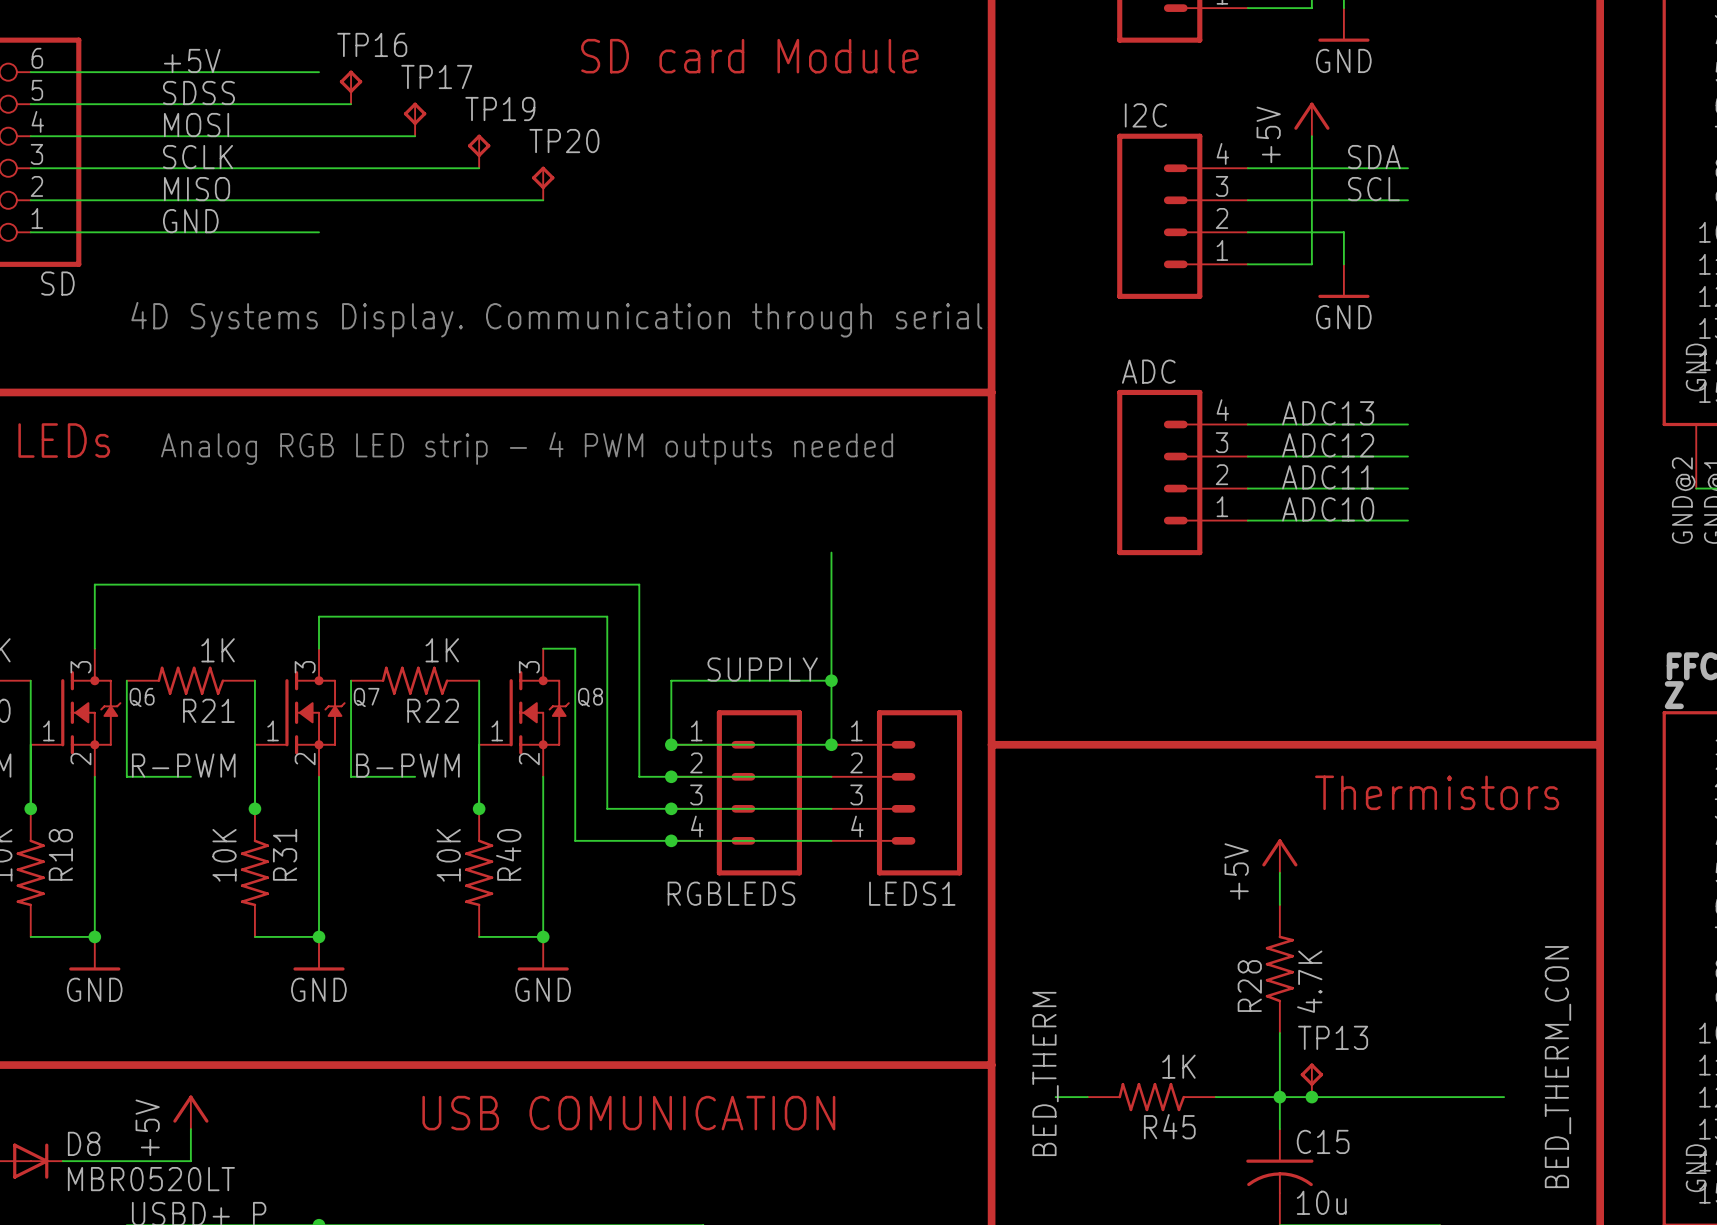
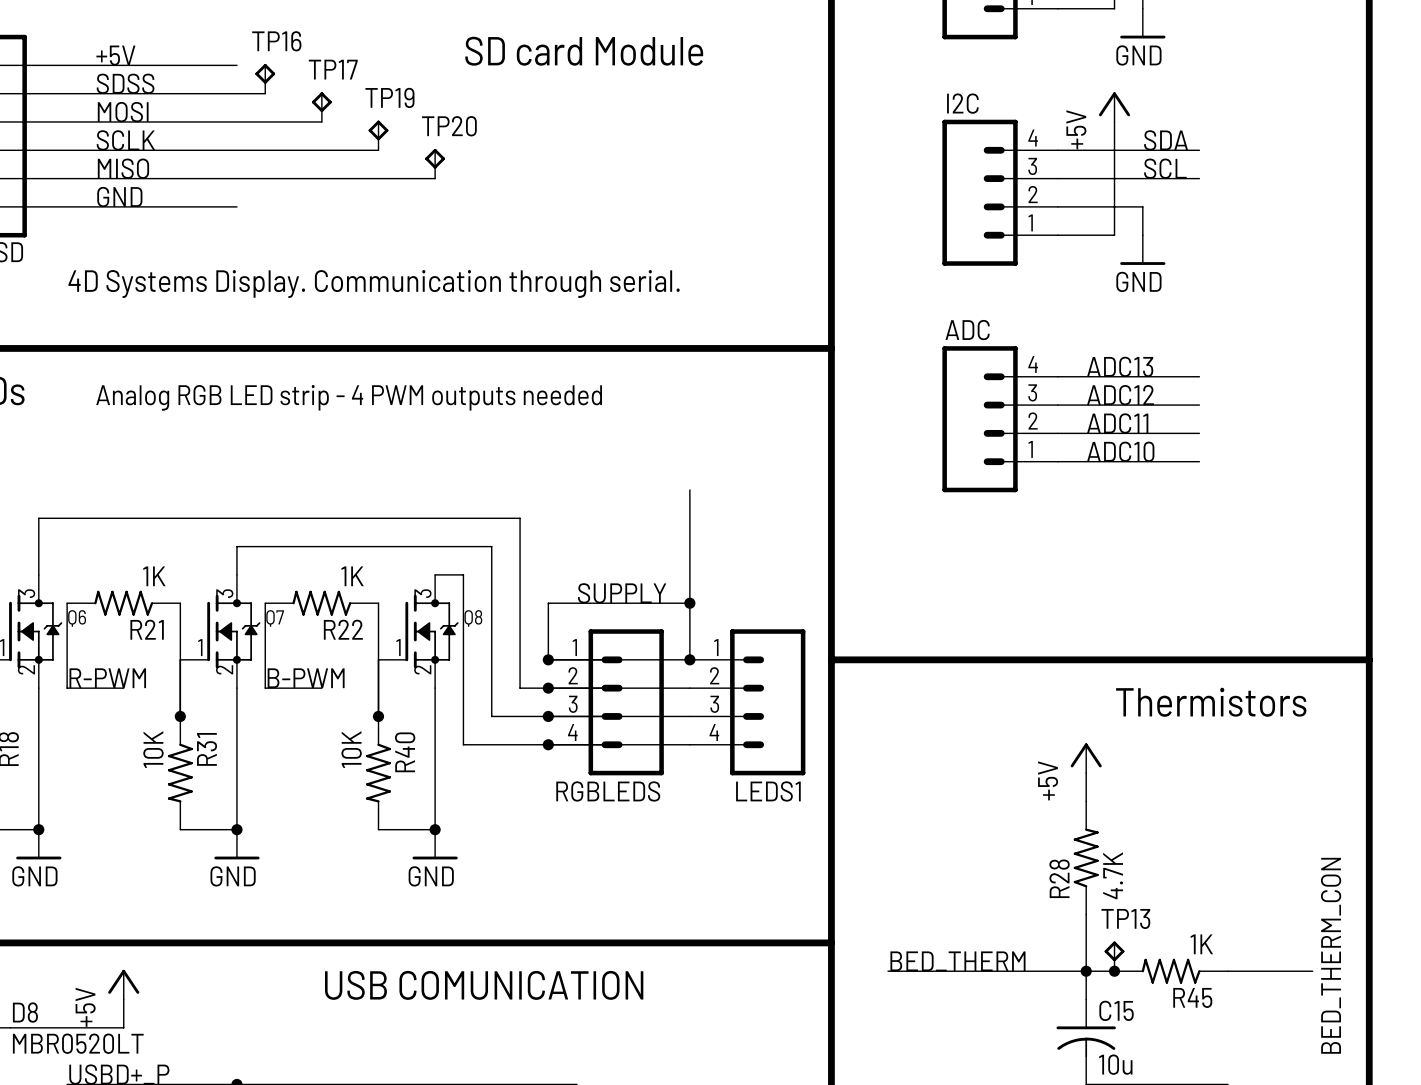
label rotation: 0° (1045, 1073) -> 90° clockwise (957, 961)
R45 position: (1151, 1097) -> (1171, 971)
wire: none -> (1284, 971) (1312, 971)

